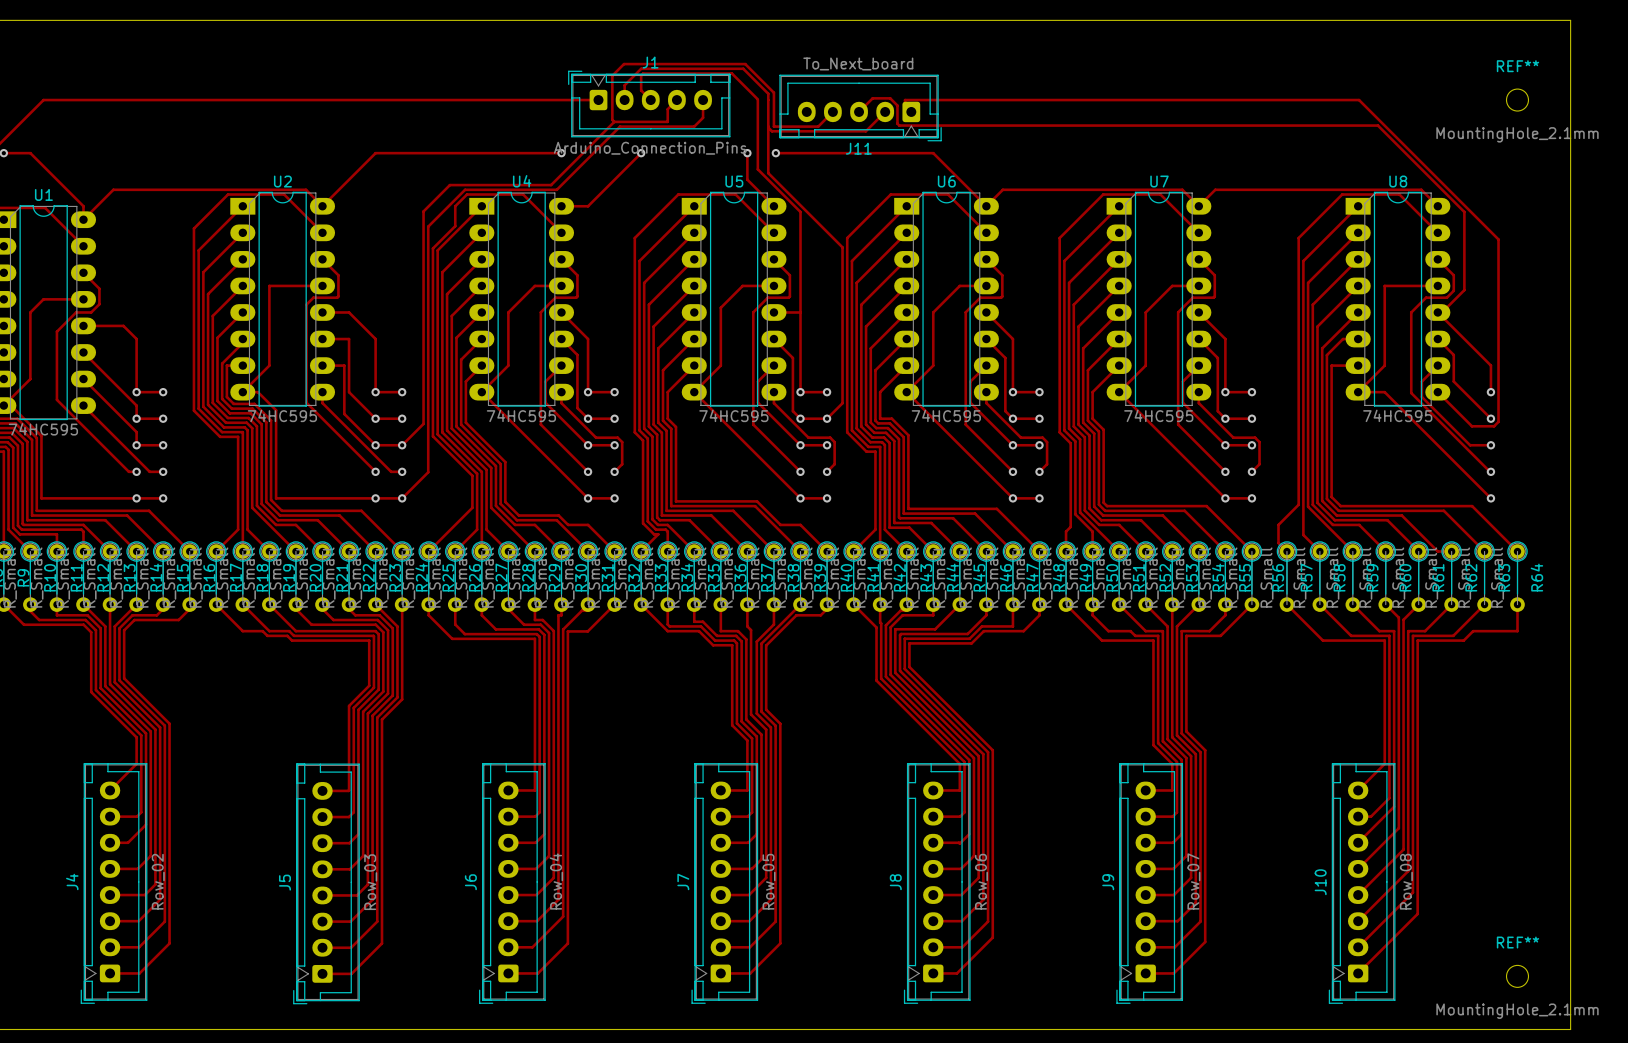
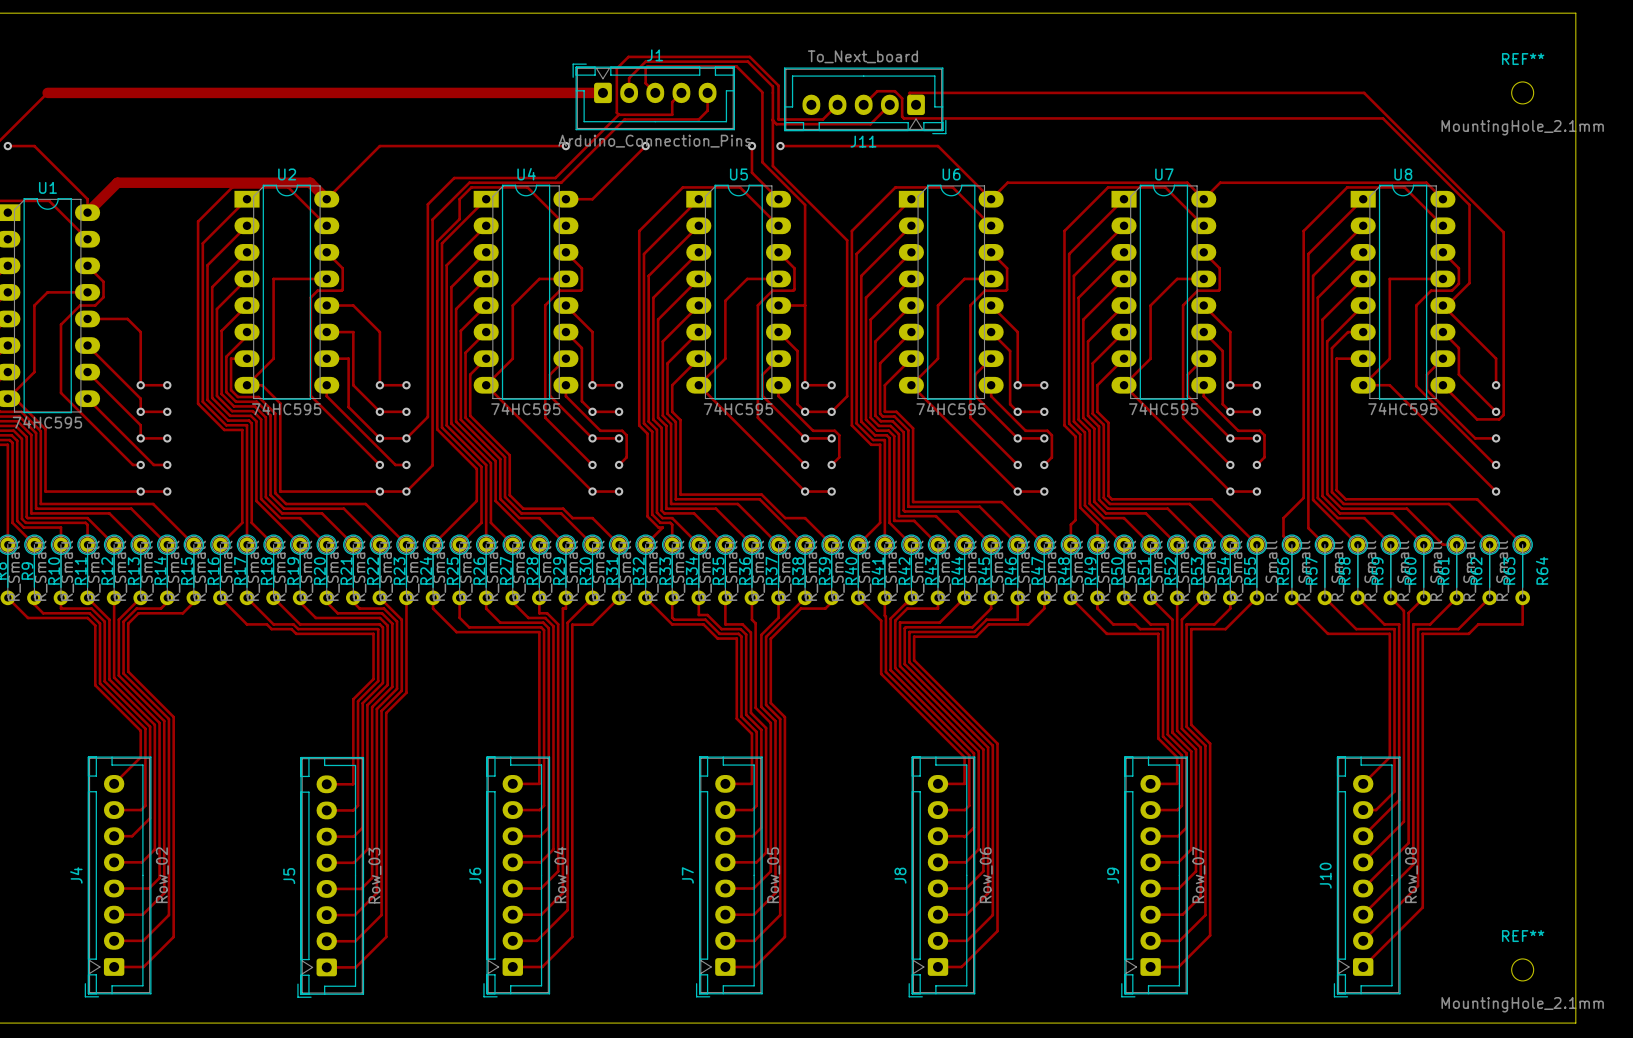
top track width: thin (43, 100) (598, 100) -> thick (47, 92) (602, 92)
top track width: thin (322, 206) (306, 189) (113, 189) (83, 219) -> thick (326, 199) (310, 182) (117, 182) (87, 212)

